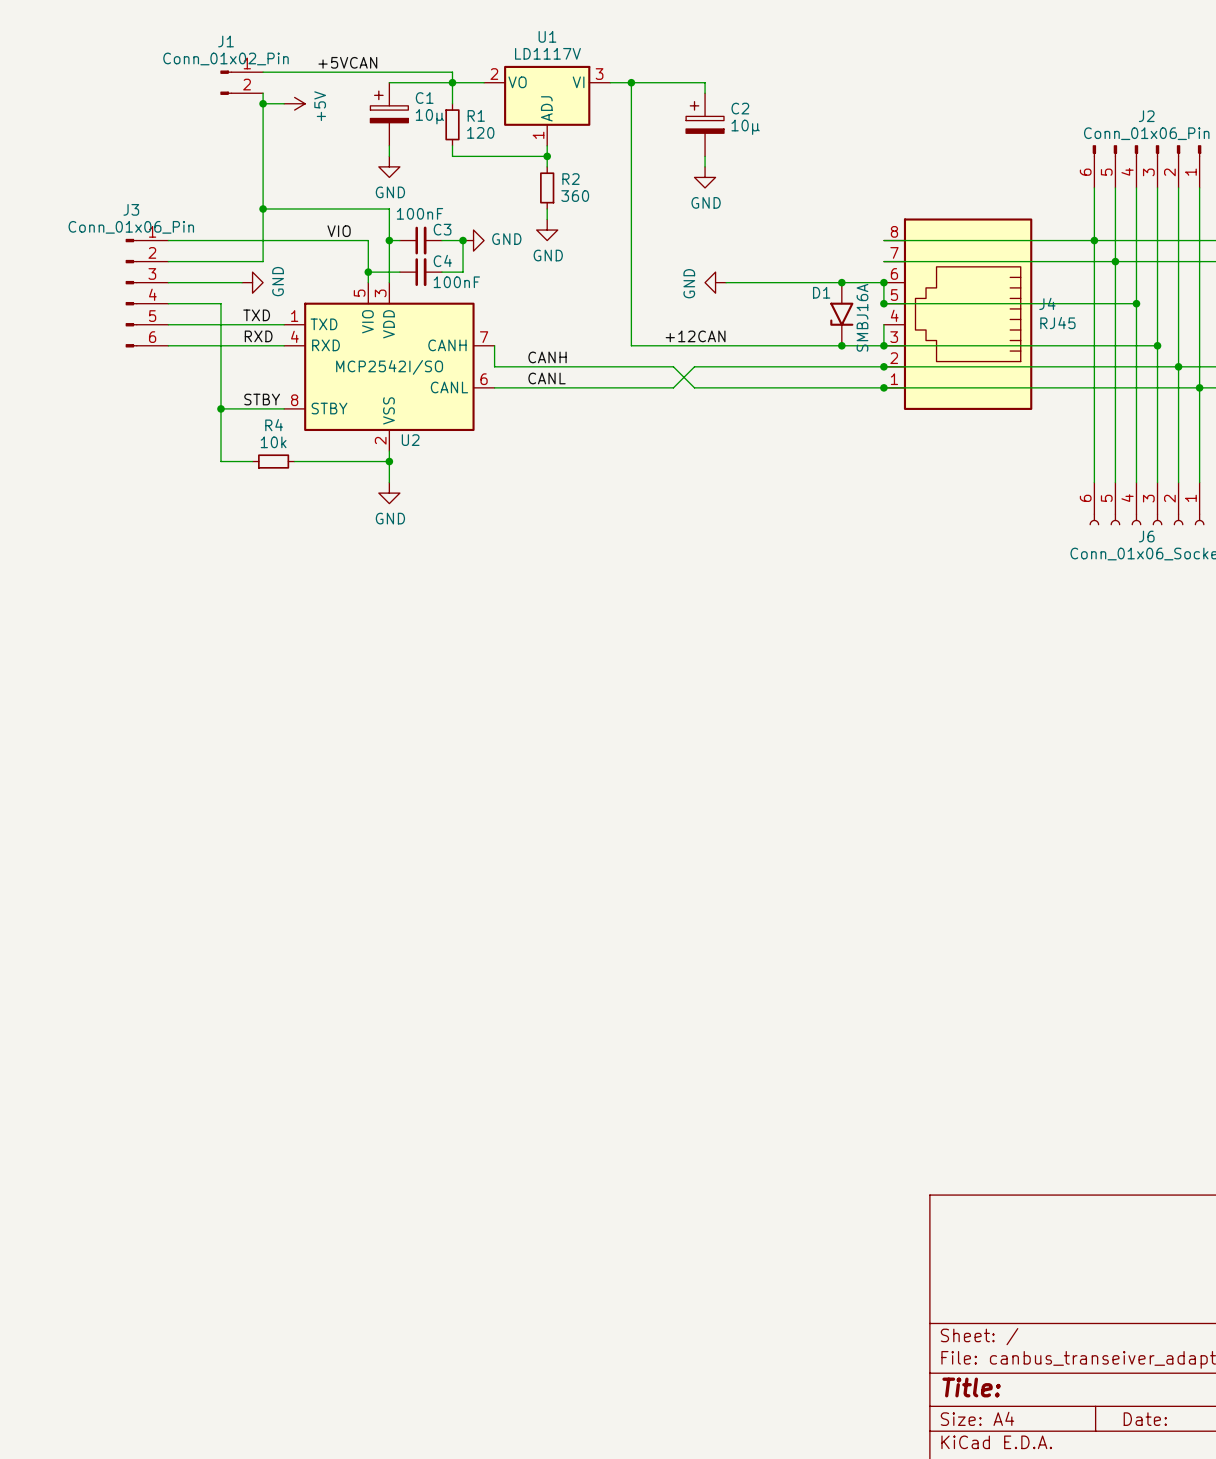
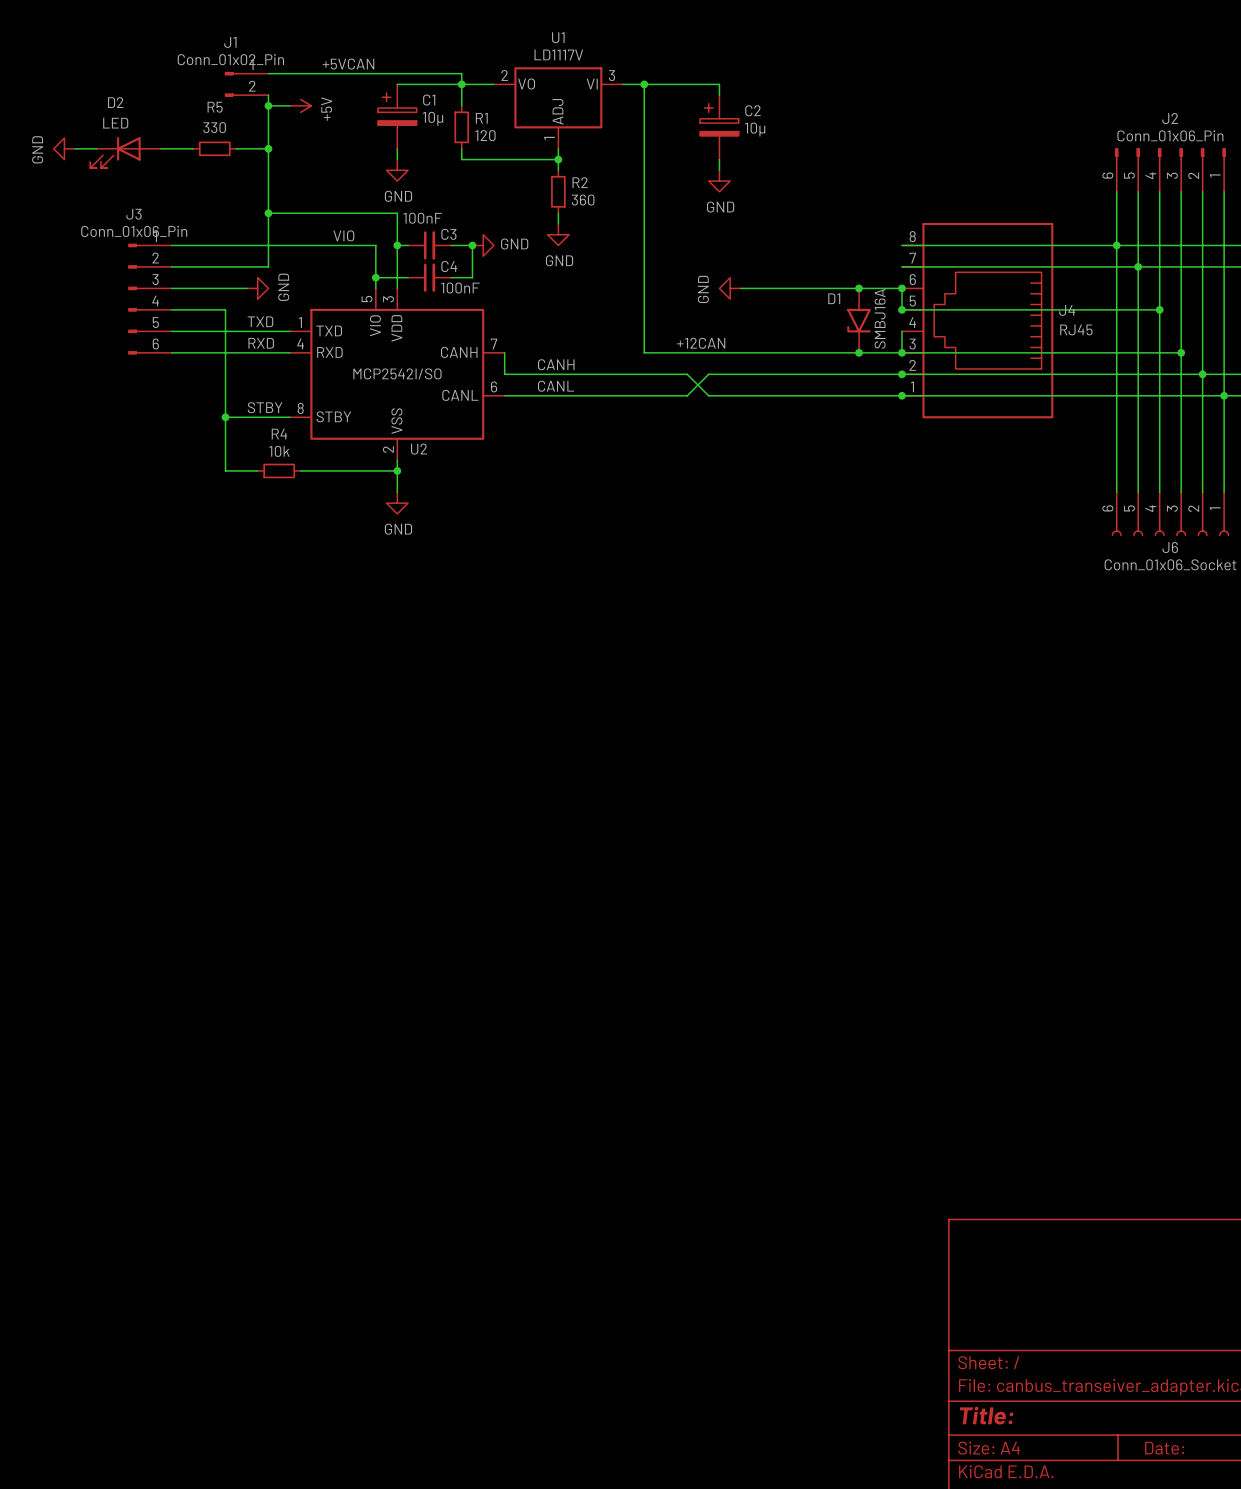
power symbol: none -> GND (64, 148)
wire: none -> (75, 148) (96, 148)
wire: none -> (161, 148) (193, 148)
R5: none -> 330 (214, 148)
wire: none -> (236, 148) (268, 148)
junction: none -> (268, 148)
D2: none -> LED (125, 152)

